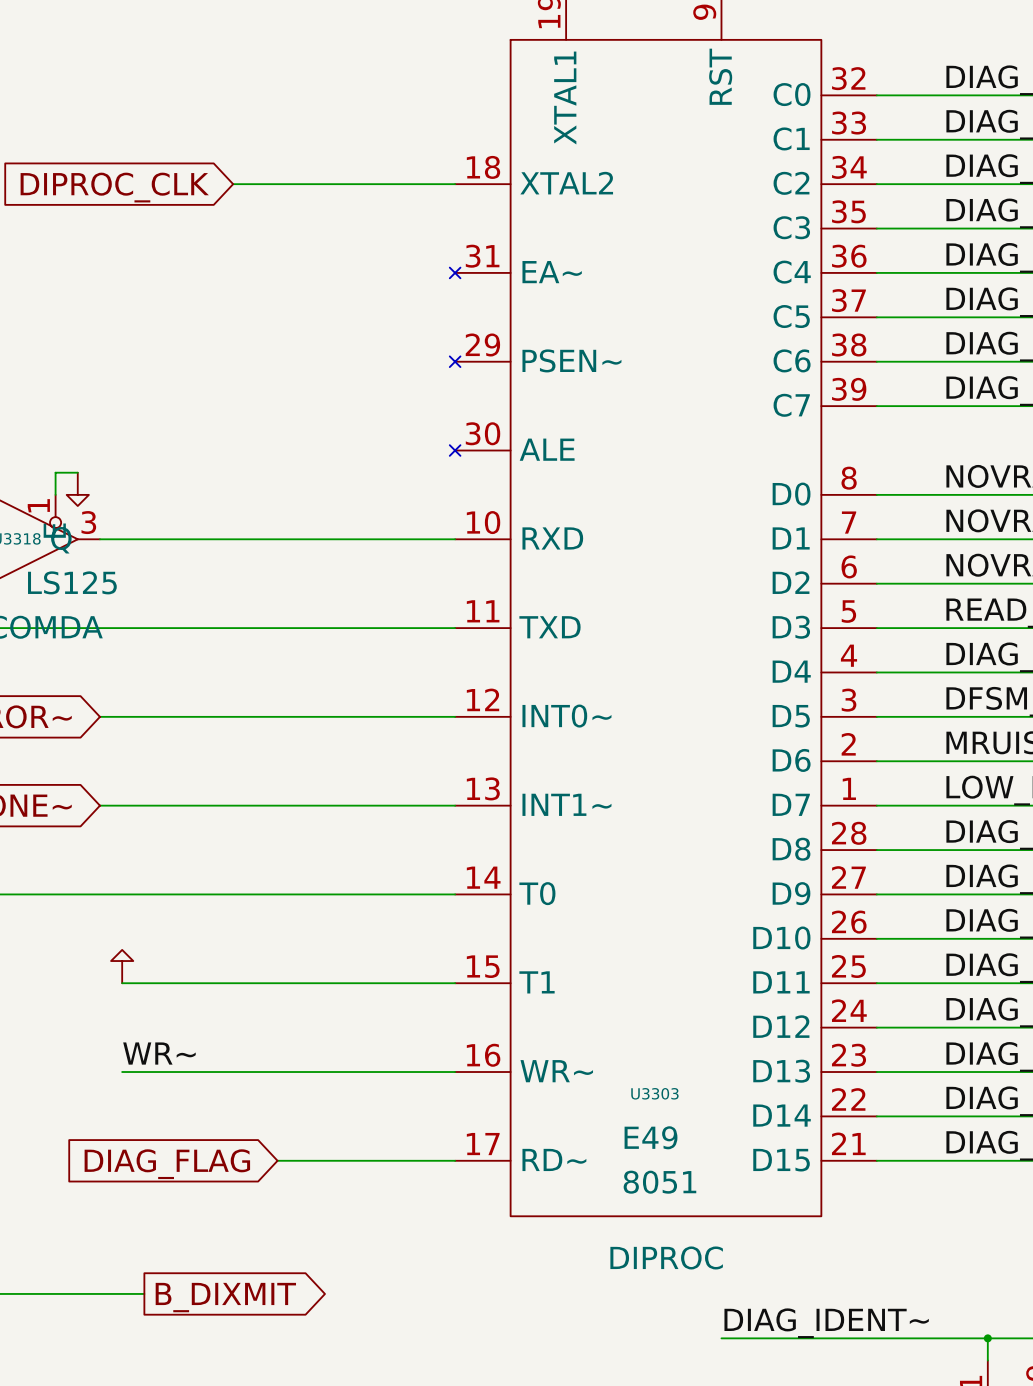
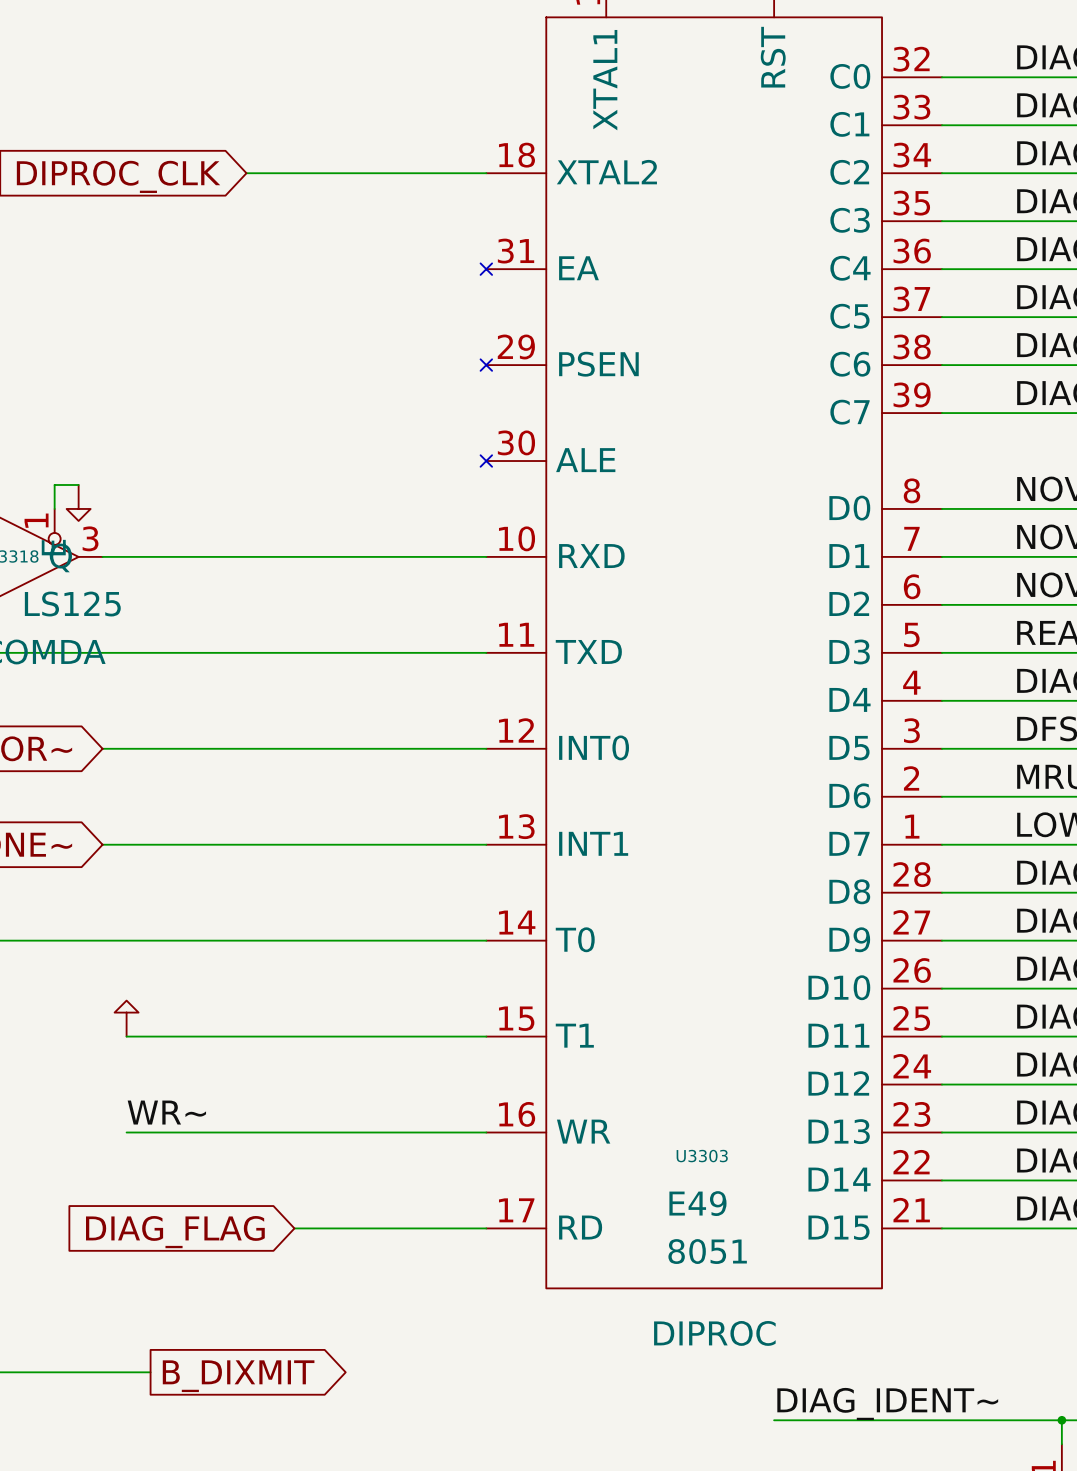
U3303 pin name: EA~ (552, 272) -> EA (578, 268)
U3303 pin name: PSEN~ (571, 360) -> PSEN (598, 364)
U3303 pin name: INT0~ (566, 716) -> INT0 (594, 747)
U3303 pin name: INT1~ (566, 804) -> INT1 (593, 843)
U3303 pin name: WR~ (556, 1071) -> WR (583, 1131)
U3303 pin name: RD~ (554, 1159) -> RD (580, 1227)

